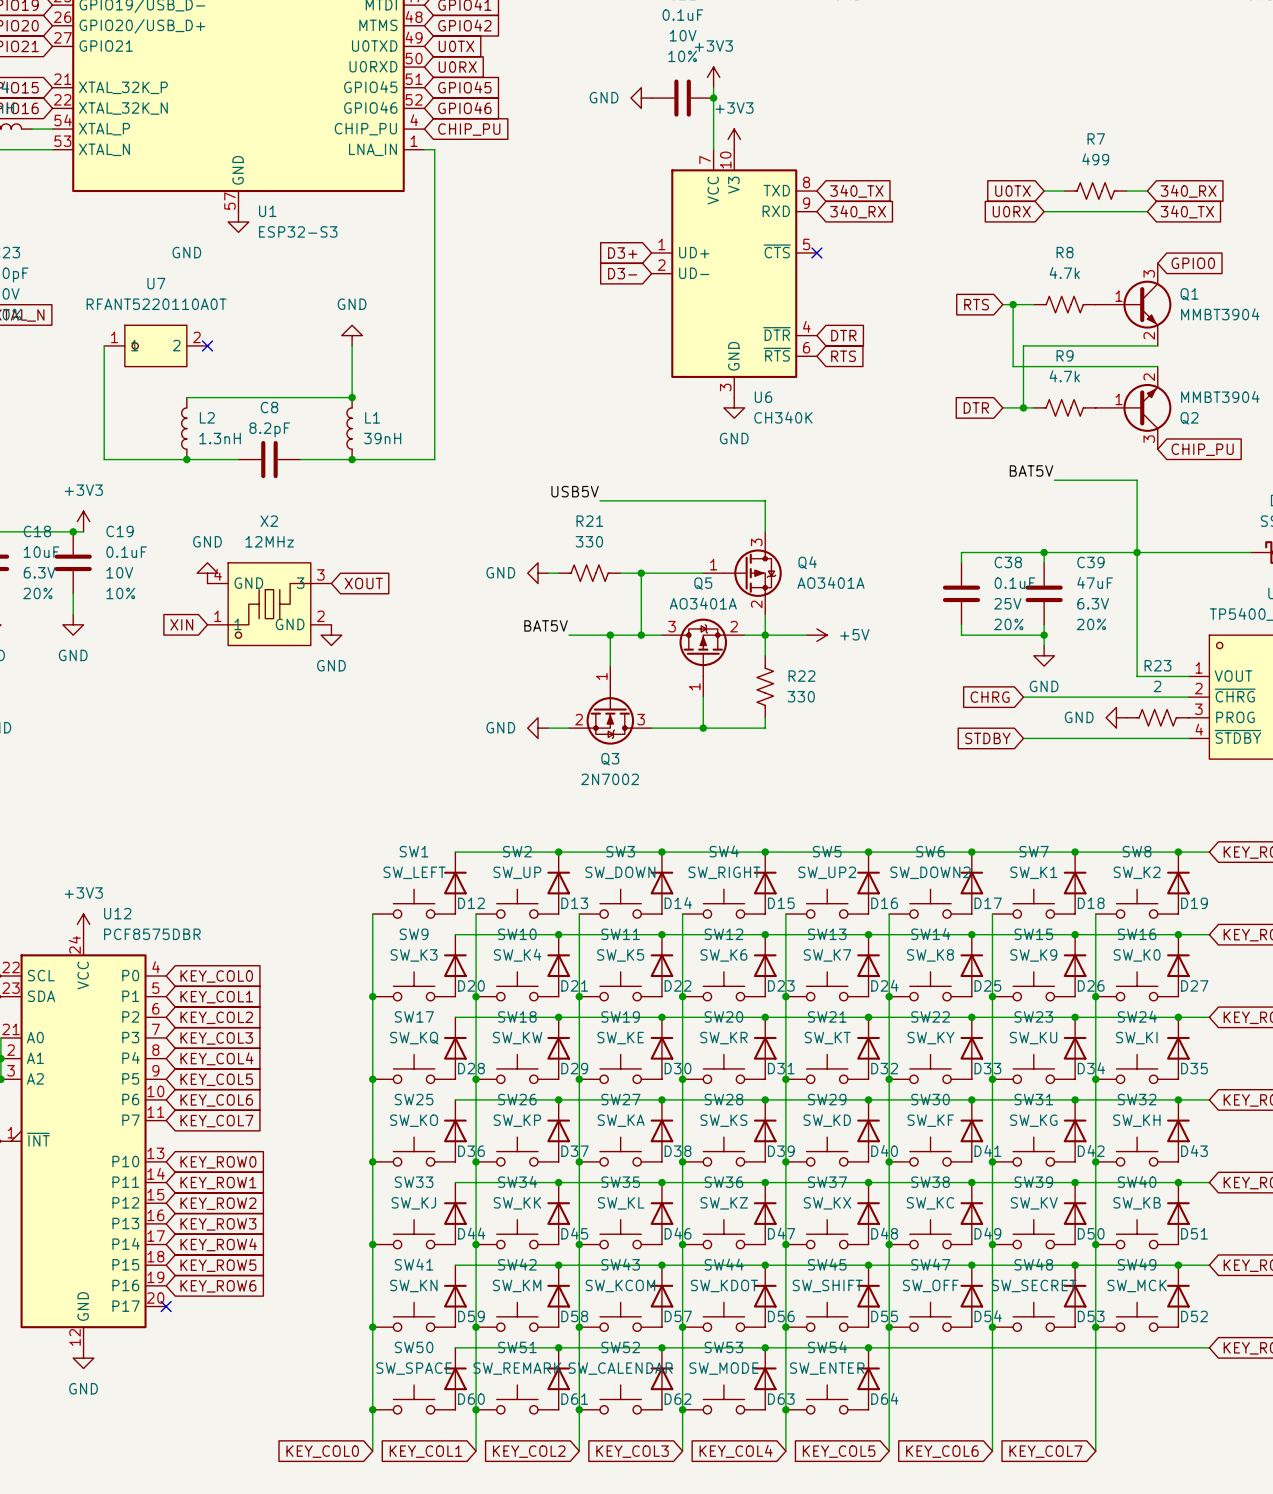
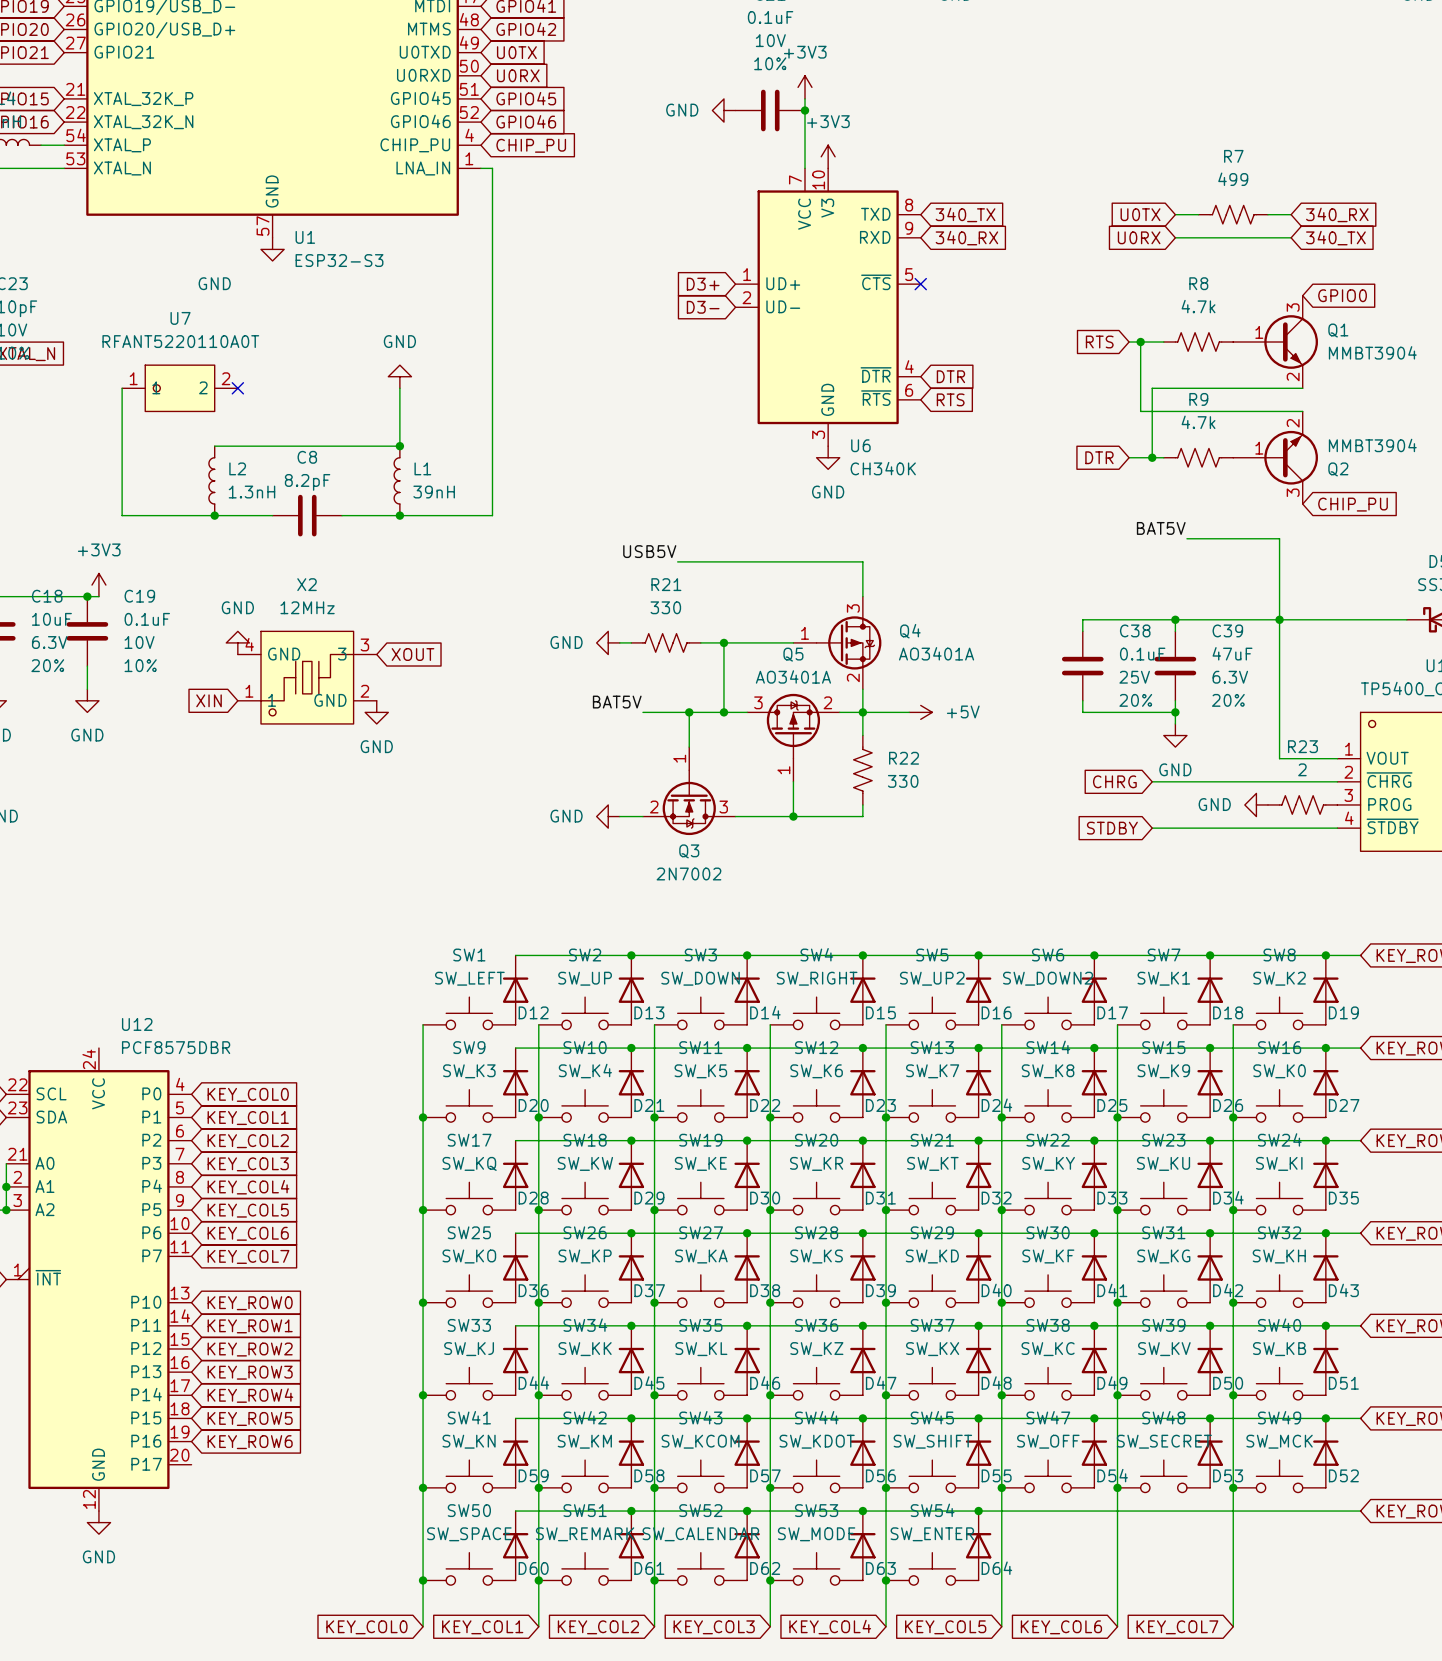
power symbol: +3V3 (83, 924) -> none
no-connect mark: (166, 1306) -> none

